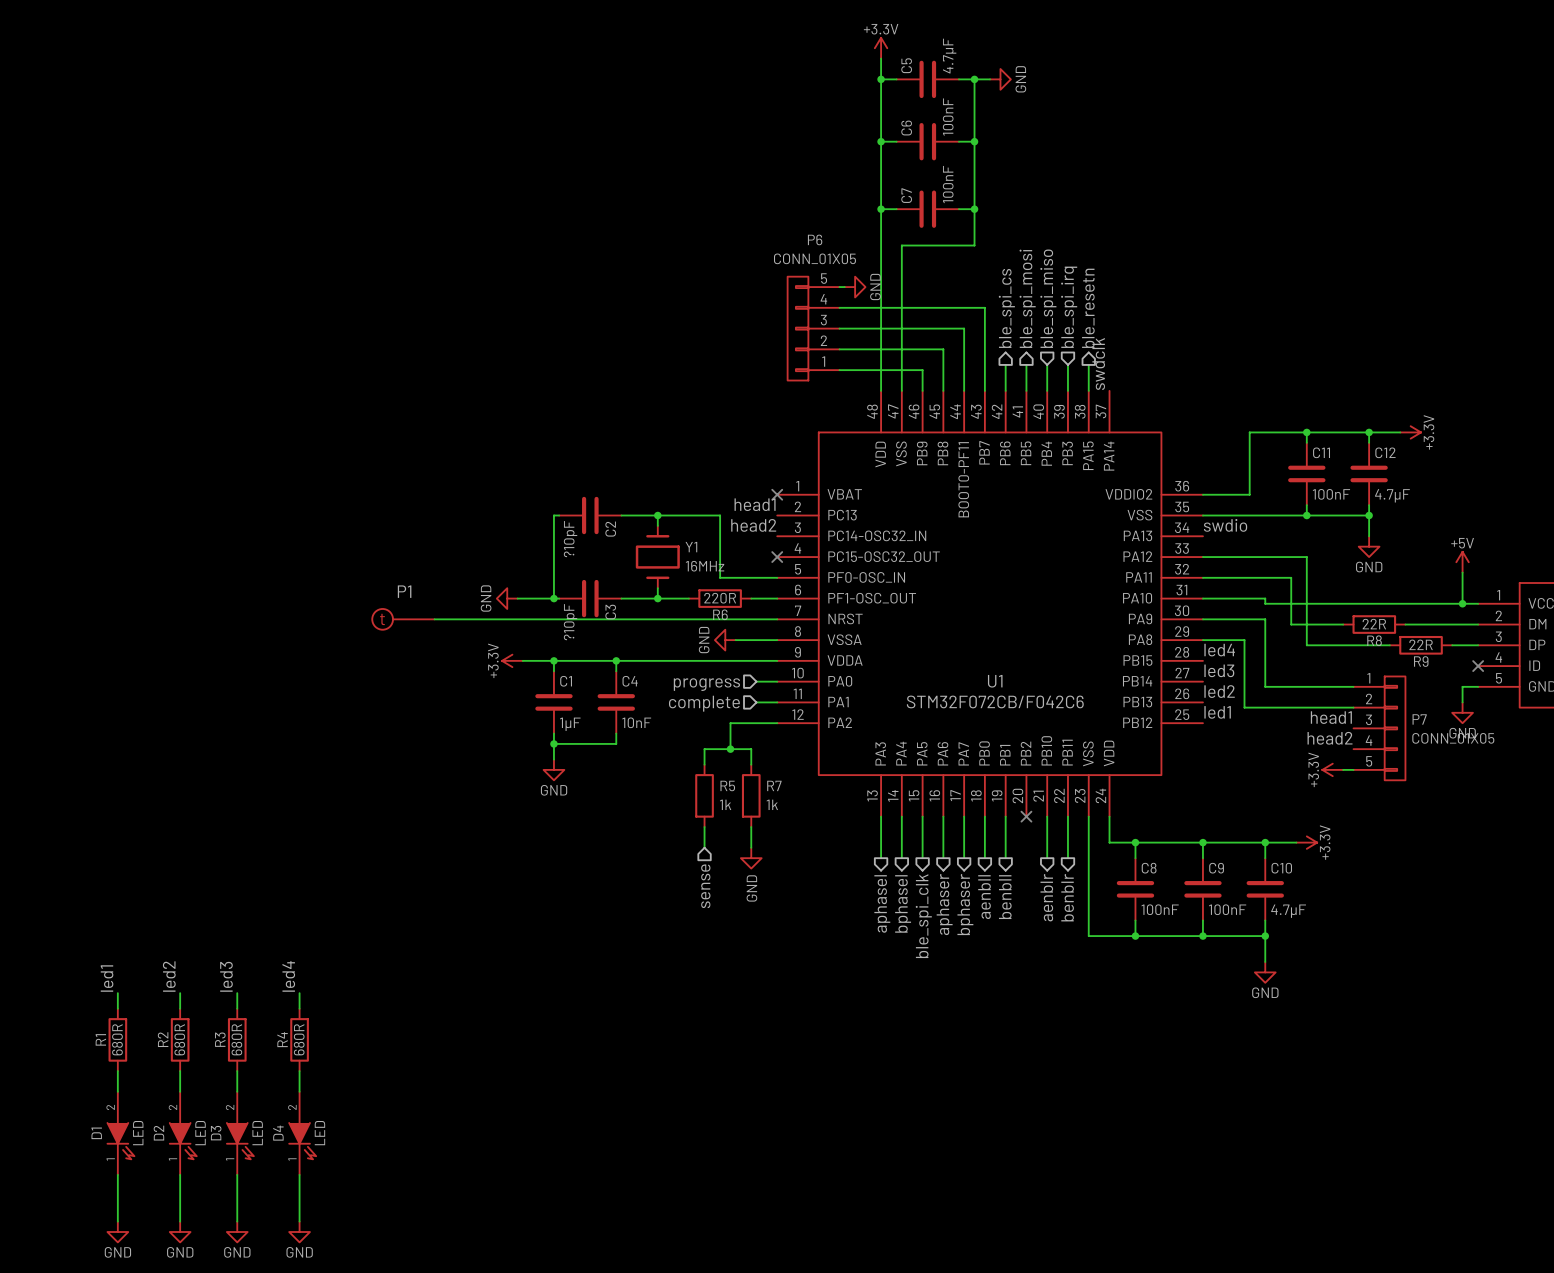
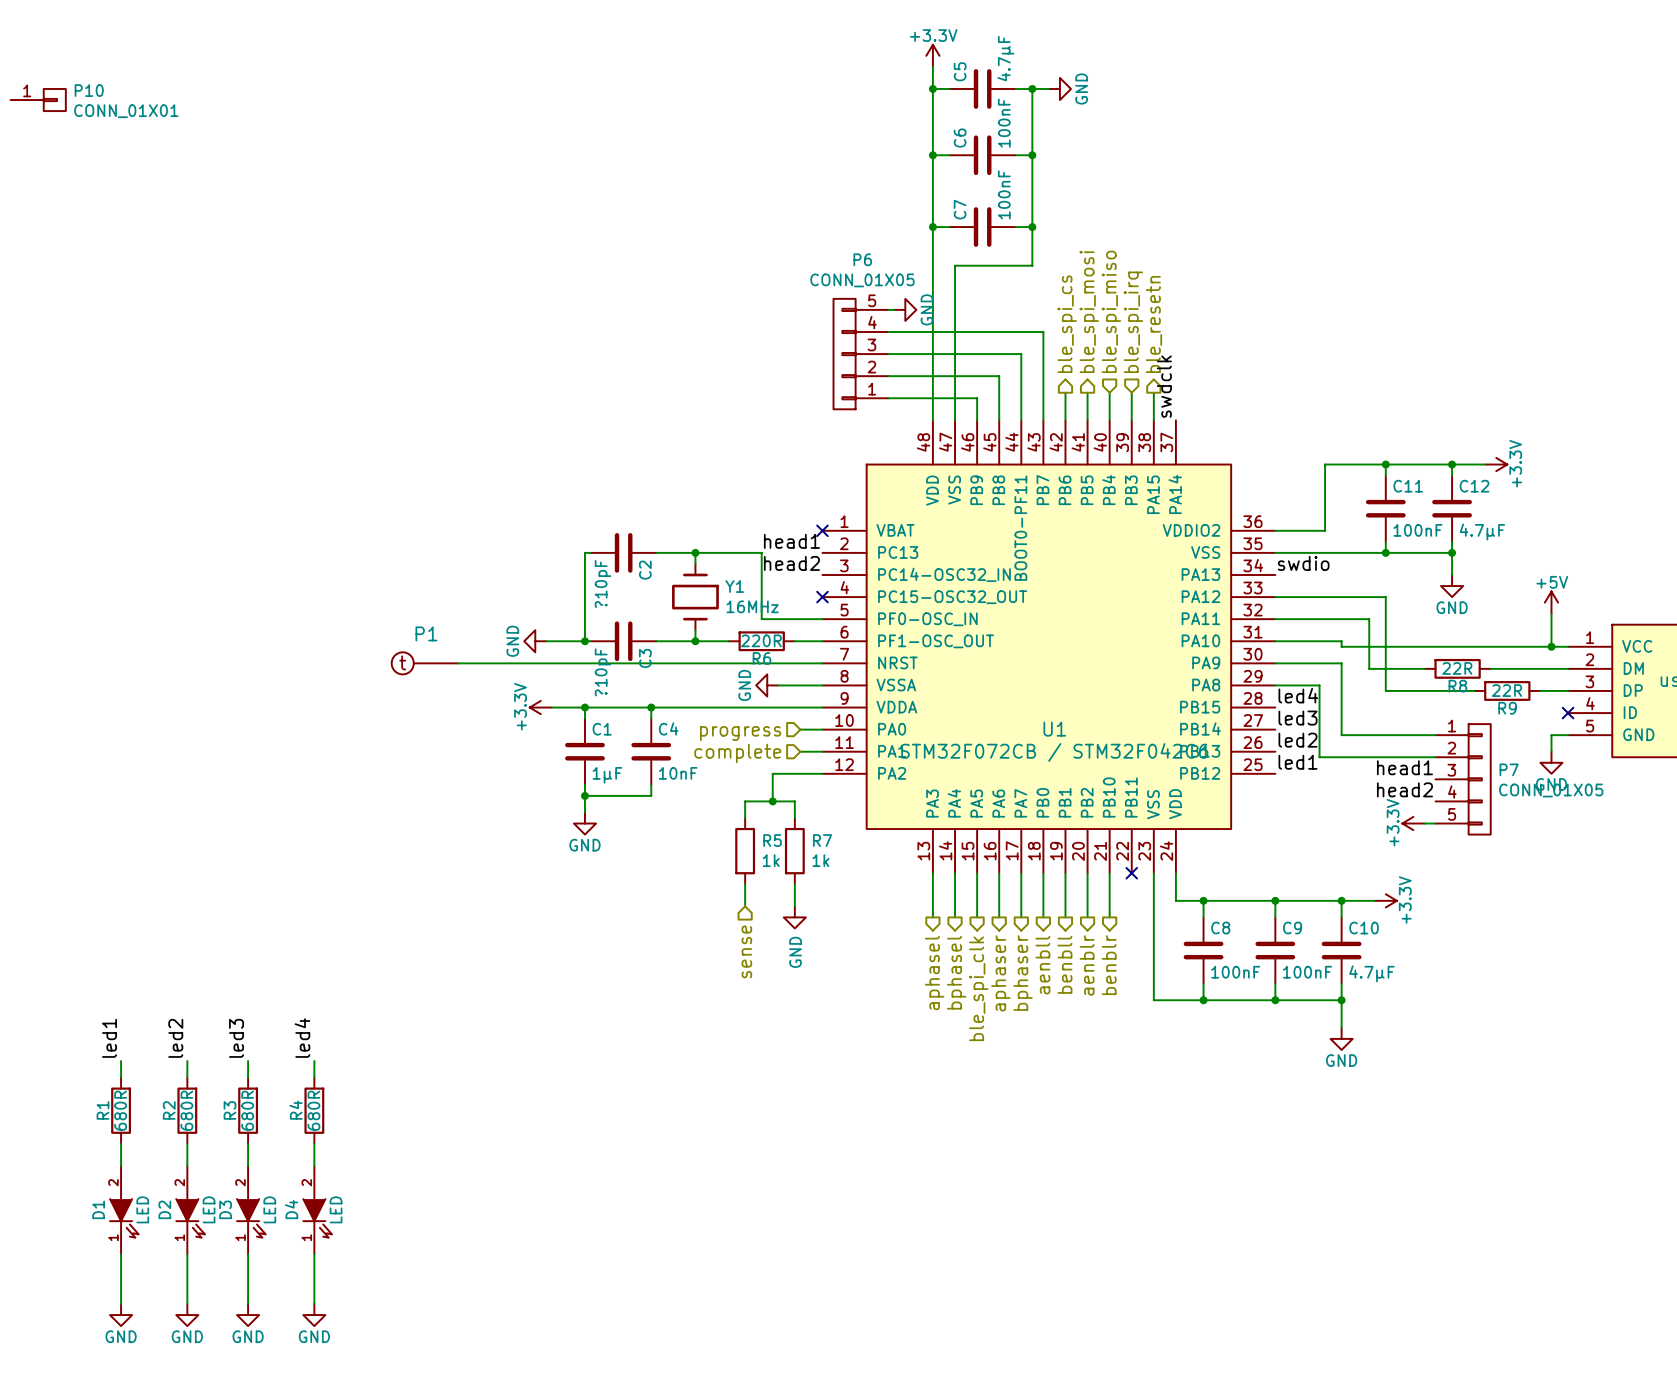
P10: none -> CONN_01X01 (38, 100)
U1 value: STM32F072CB/F042C6 (995, 701) -> STM32F072CB / STM32F042C6 (1054, 752)
no-connect mark position: (1026, 816) -> (1131, 873)
wire: (1067, 816) (1067, 858) -> (1087, 873) (1087, 917)
hierarchical label: none -> aenblr (1087, 965)
hierarchical label: aenblr (1046, 897) -> benblr (1109, 965)
hierarchical label: benblr (1067, 897) -> none

